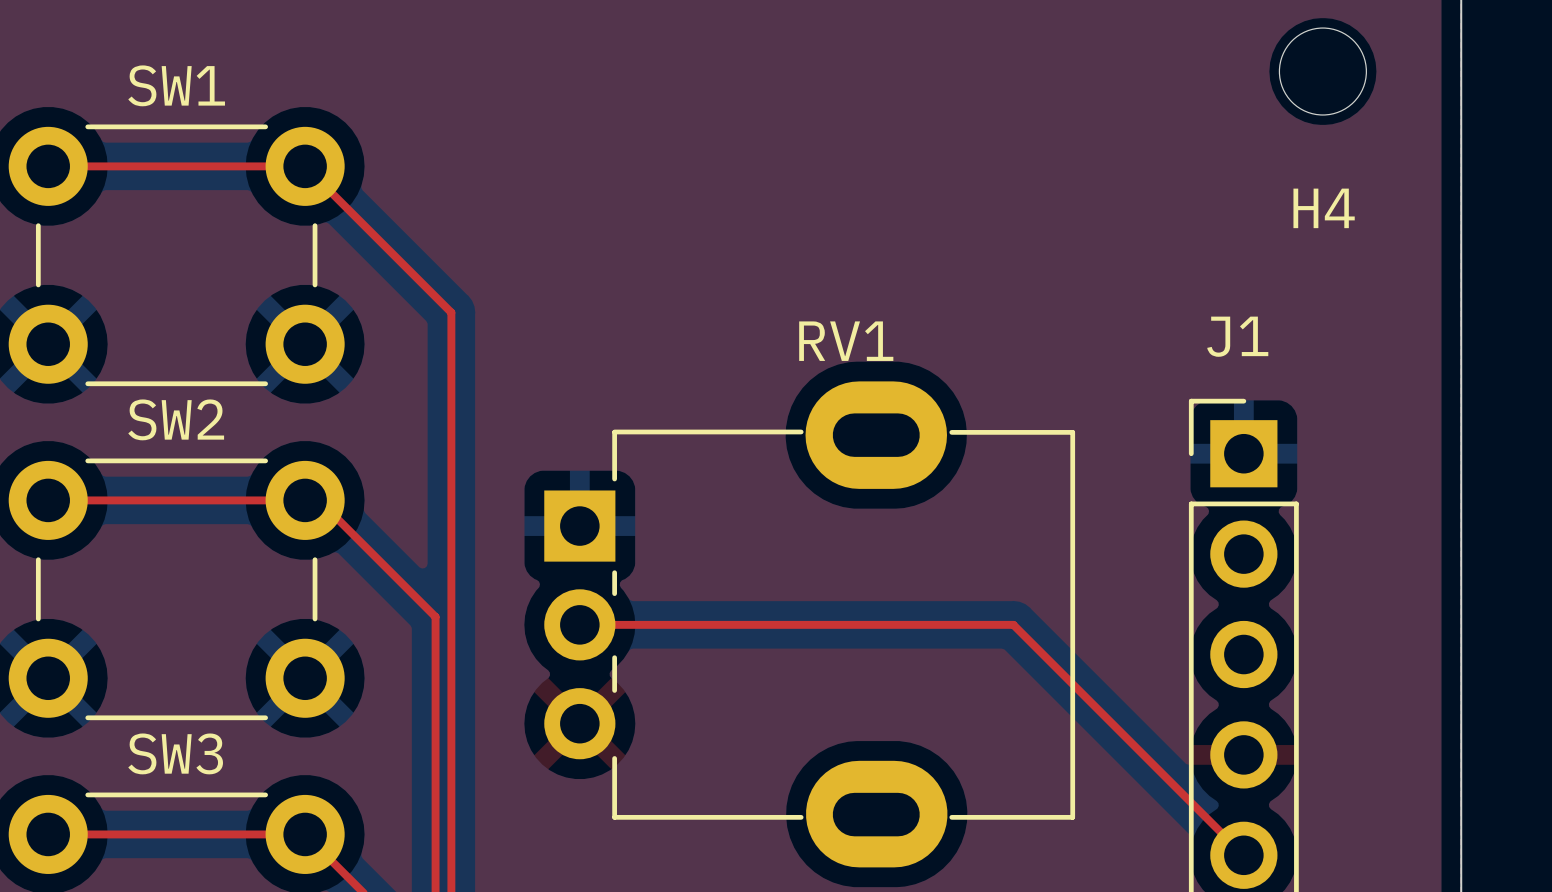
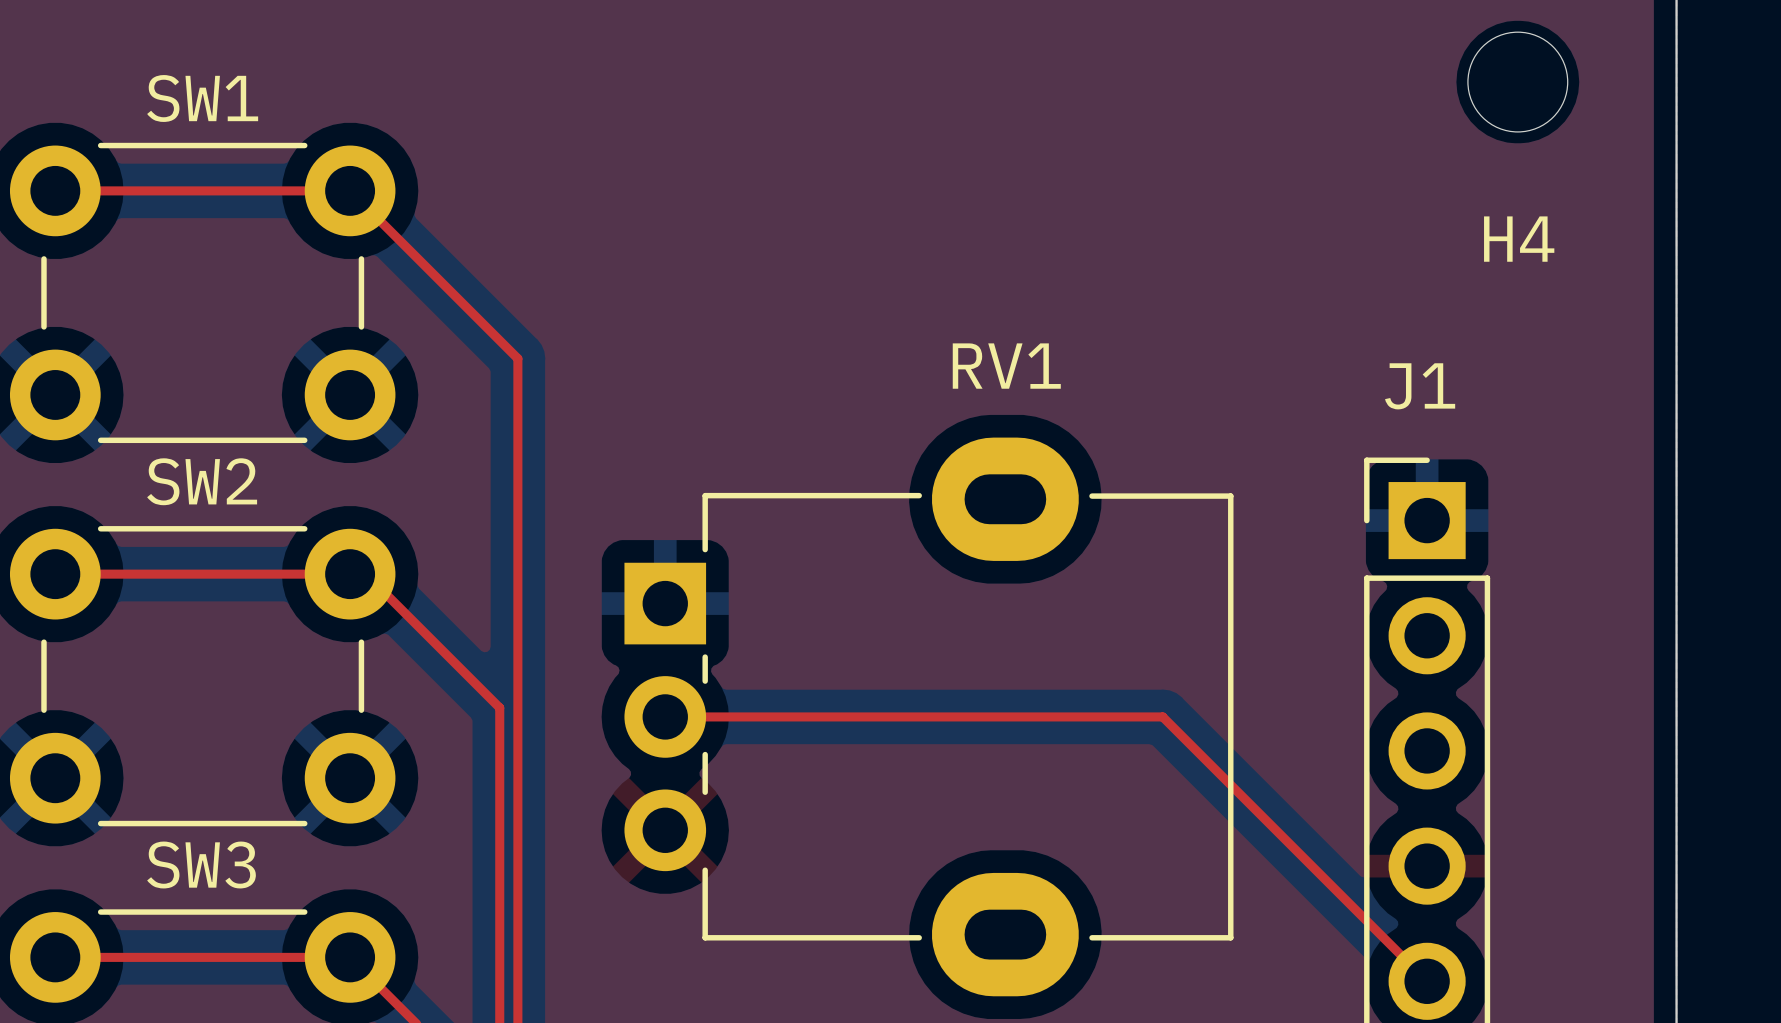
RV1 name position: RV1 (846, 341) -> RV1 (1006, 366)
RV1 footprint: [544, 381, 1076, 868] -> [624, 437, 1234, 997]

